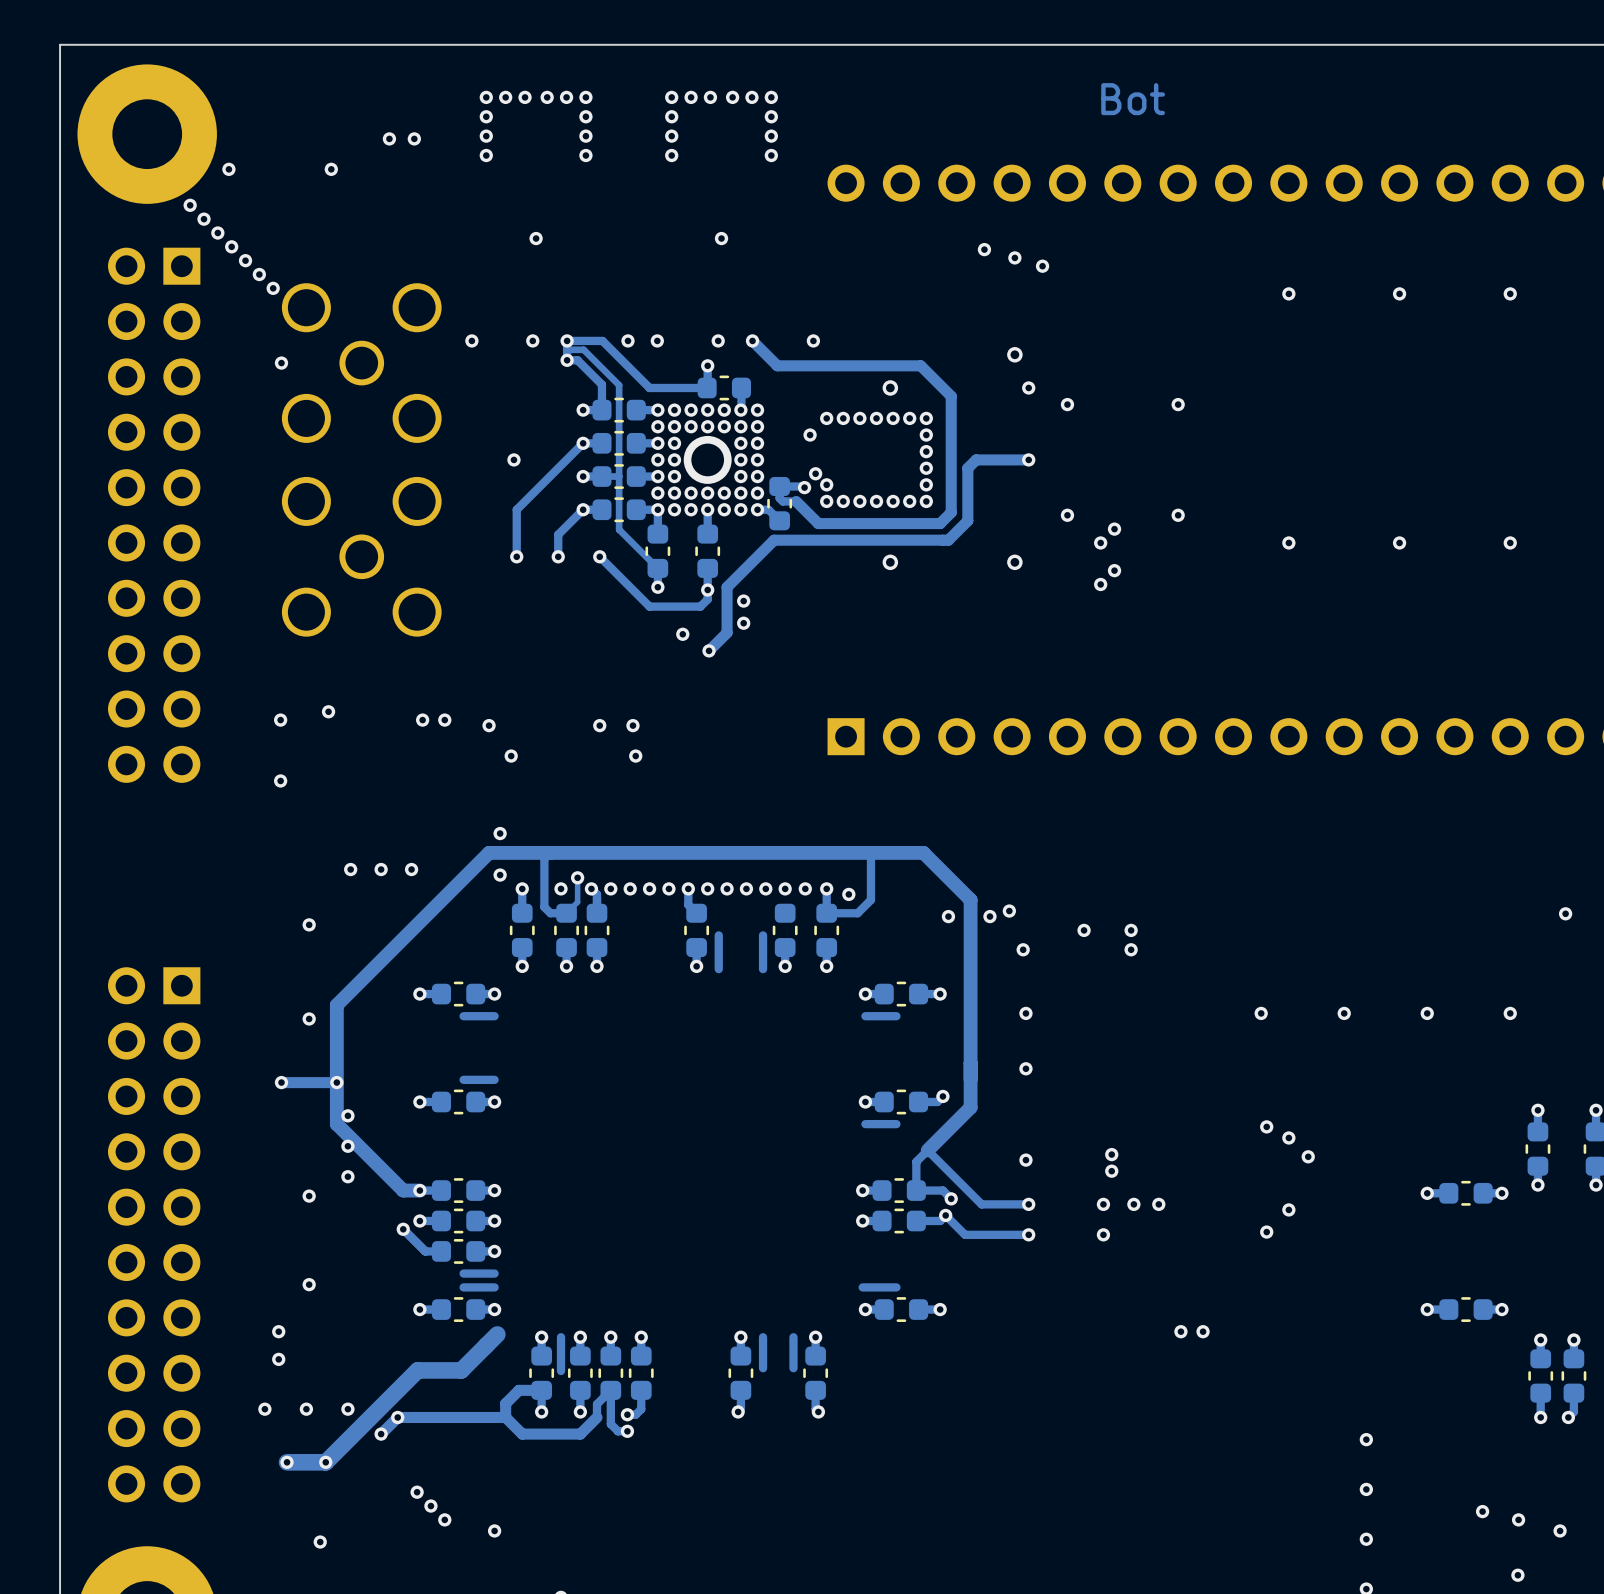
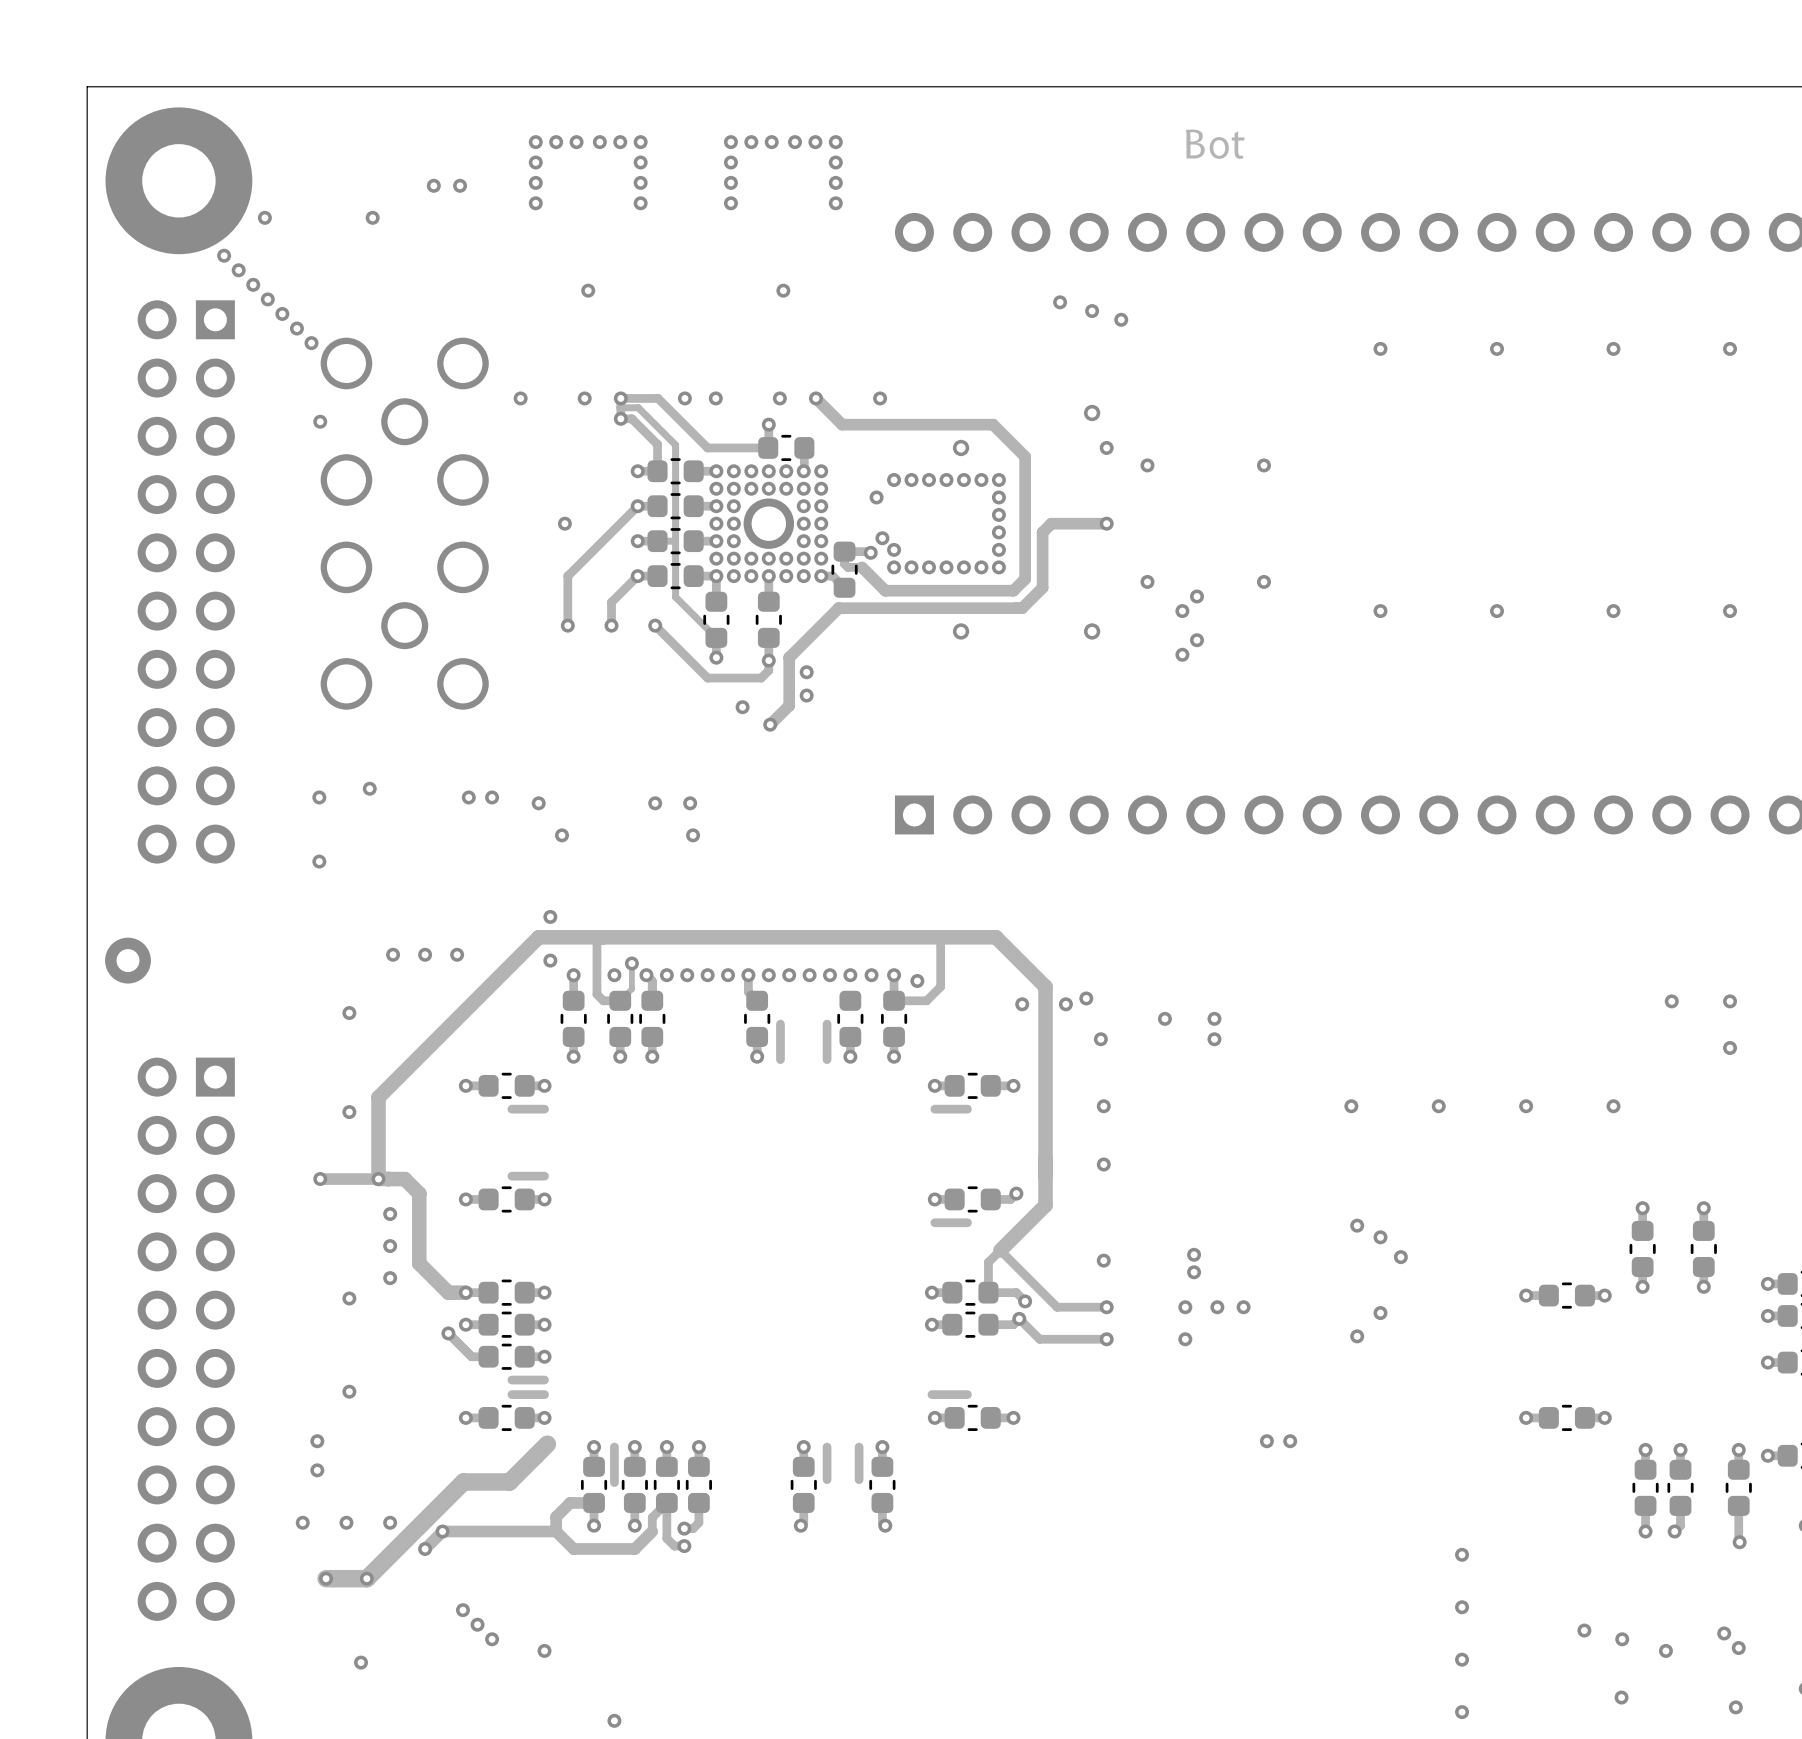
part: none -> (128, 960)
track: (336, 1082) (336, 1124) (375, 1162) -> (388, 1179) (404, 1179) (419, 1193) (419, 1263)

